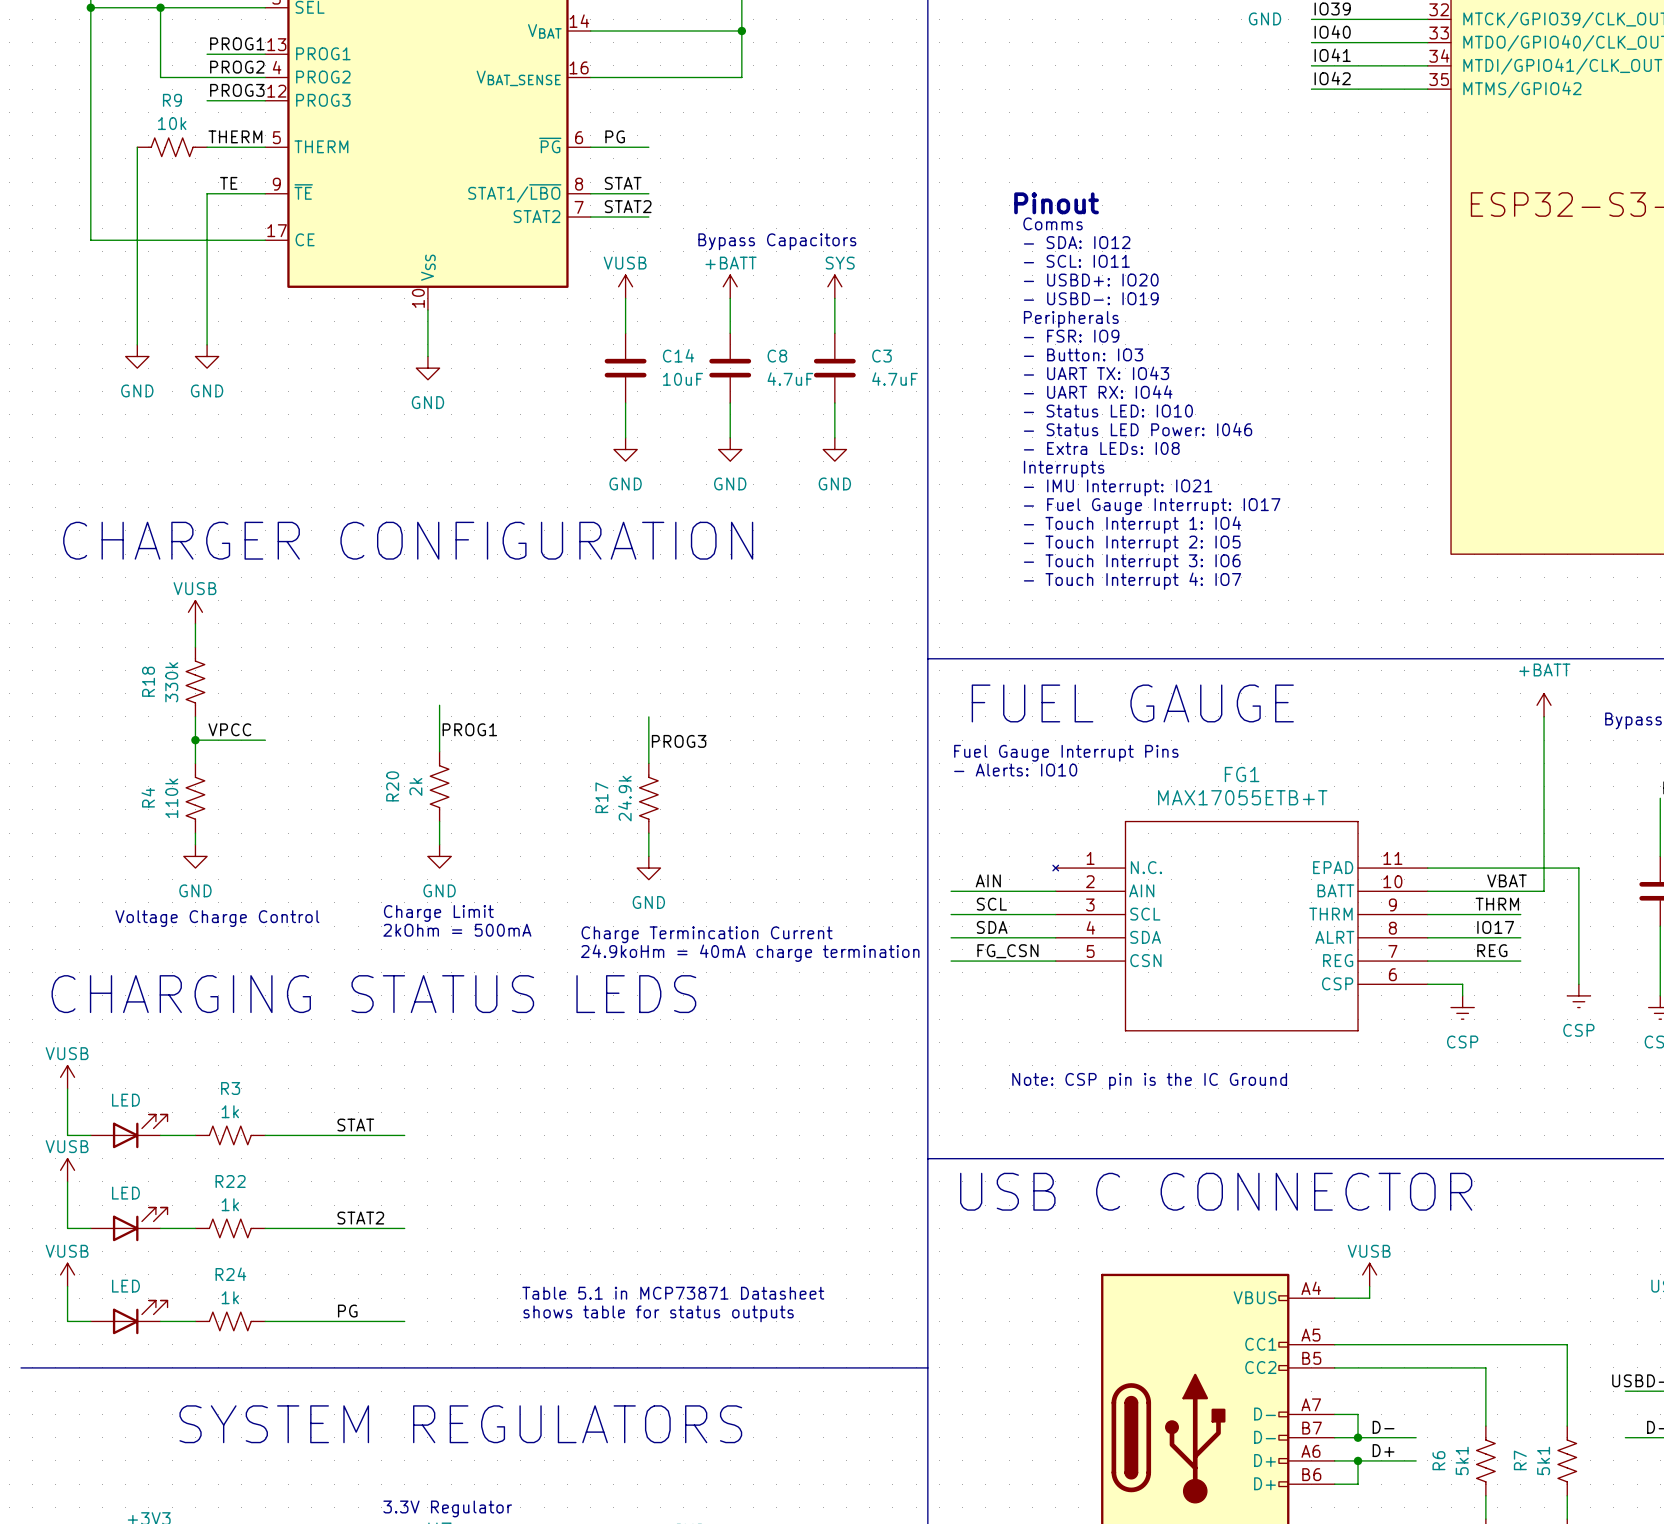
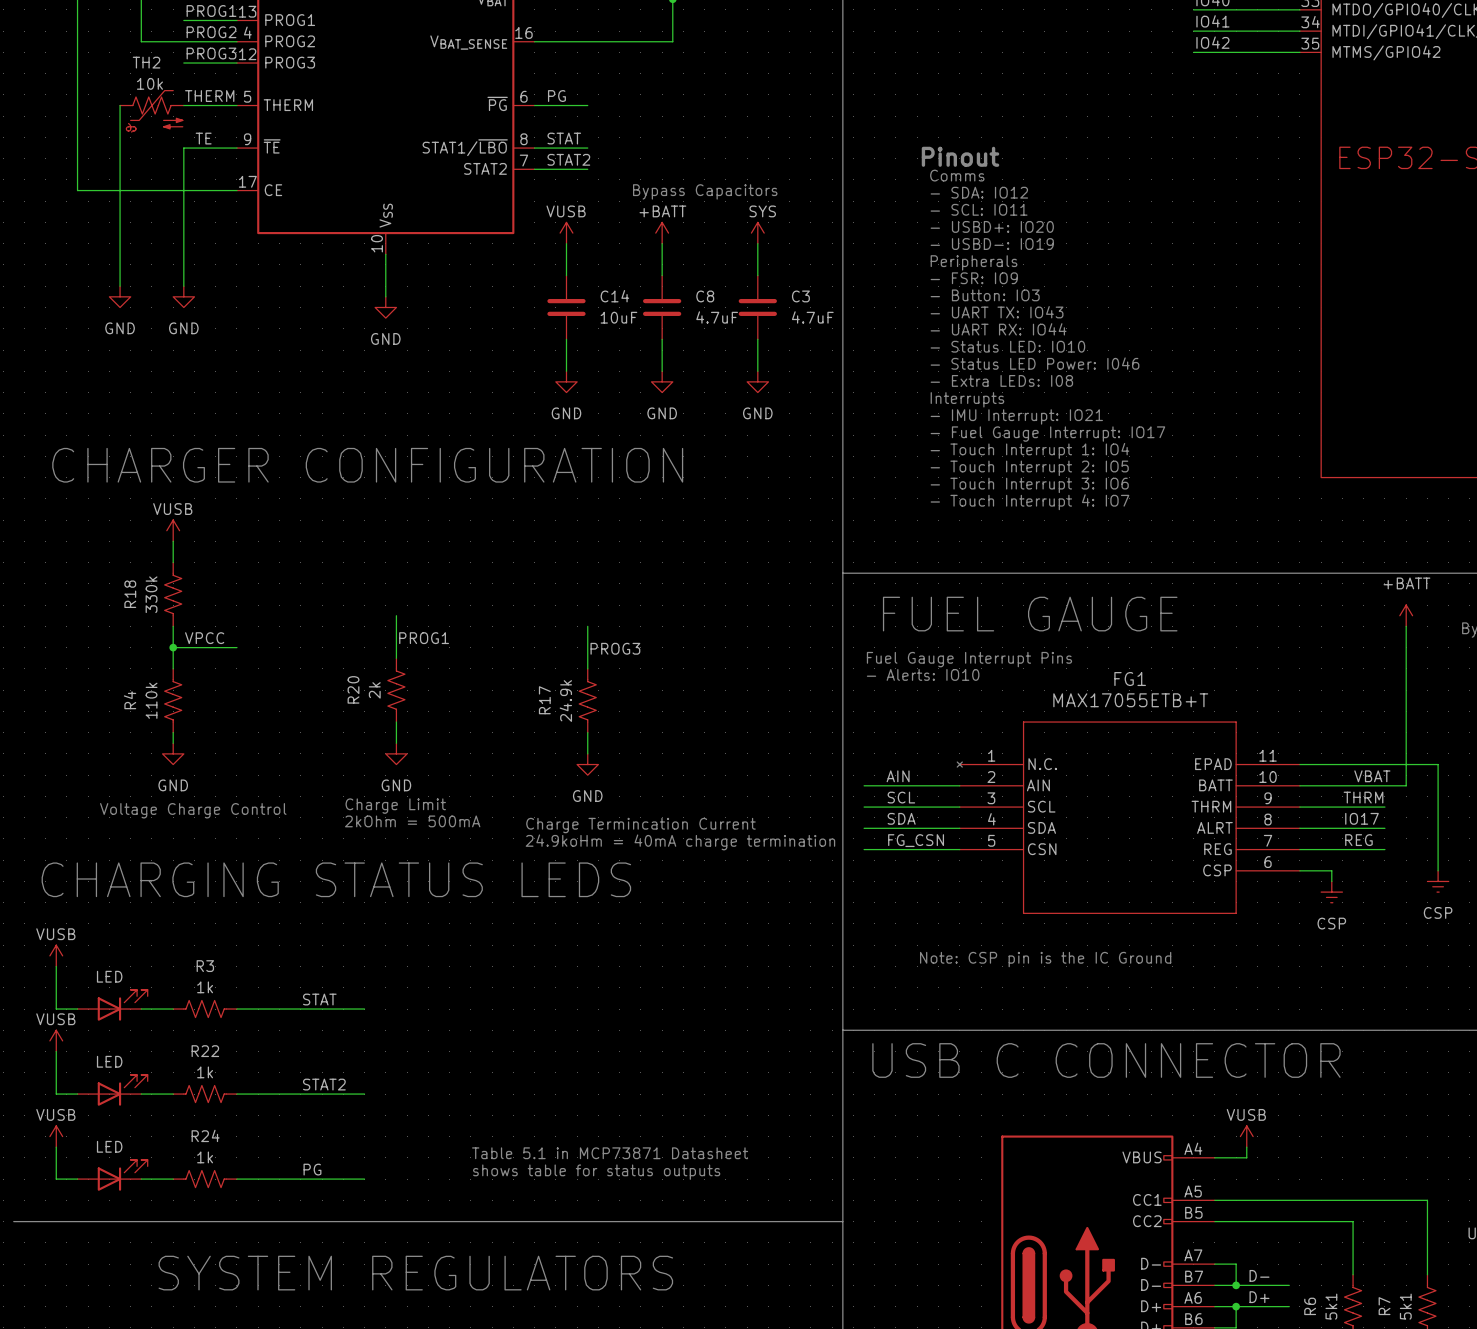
R9: 10k (172, 147) -> none
TH2: none -> 10k (151, 111)

